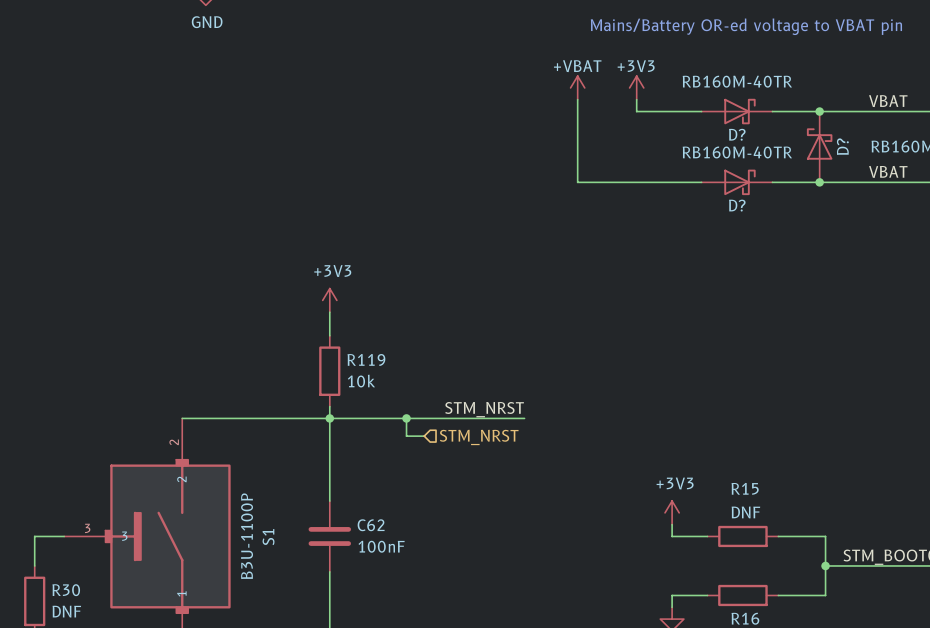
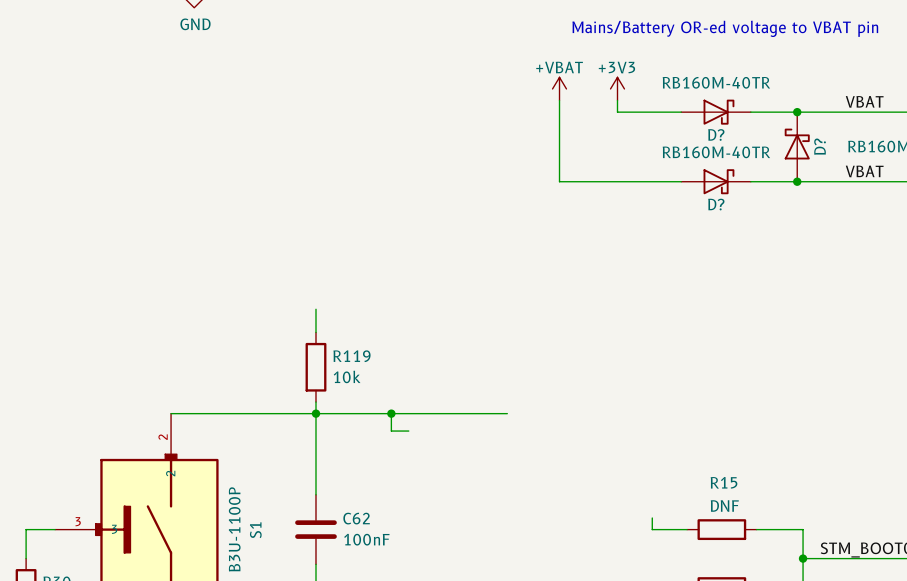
power symbol: +3V3 (329, 300) -> none
label: STM_NRST (484, 409) -> none
hierarchical label: STM_NRST (479, 437) -> none
power symbol: +3V3 (672, 512) -> none

